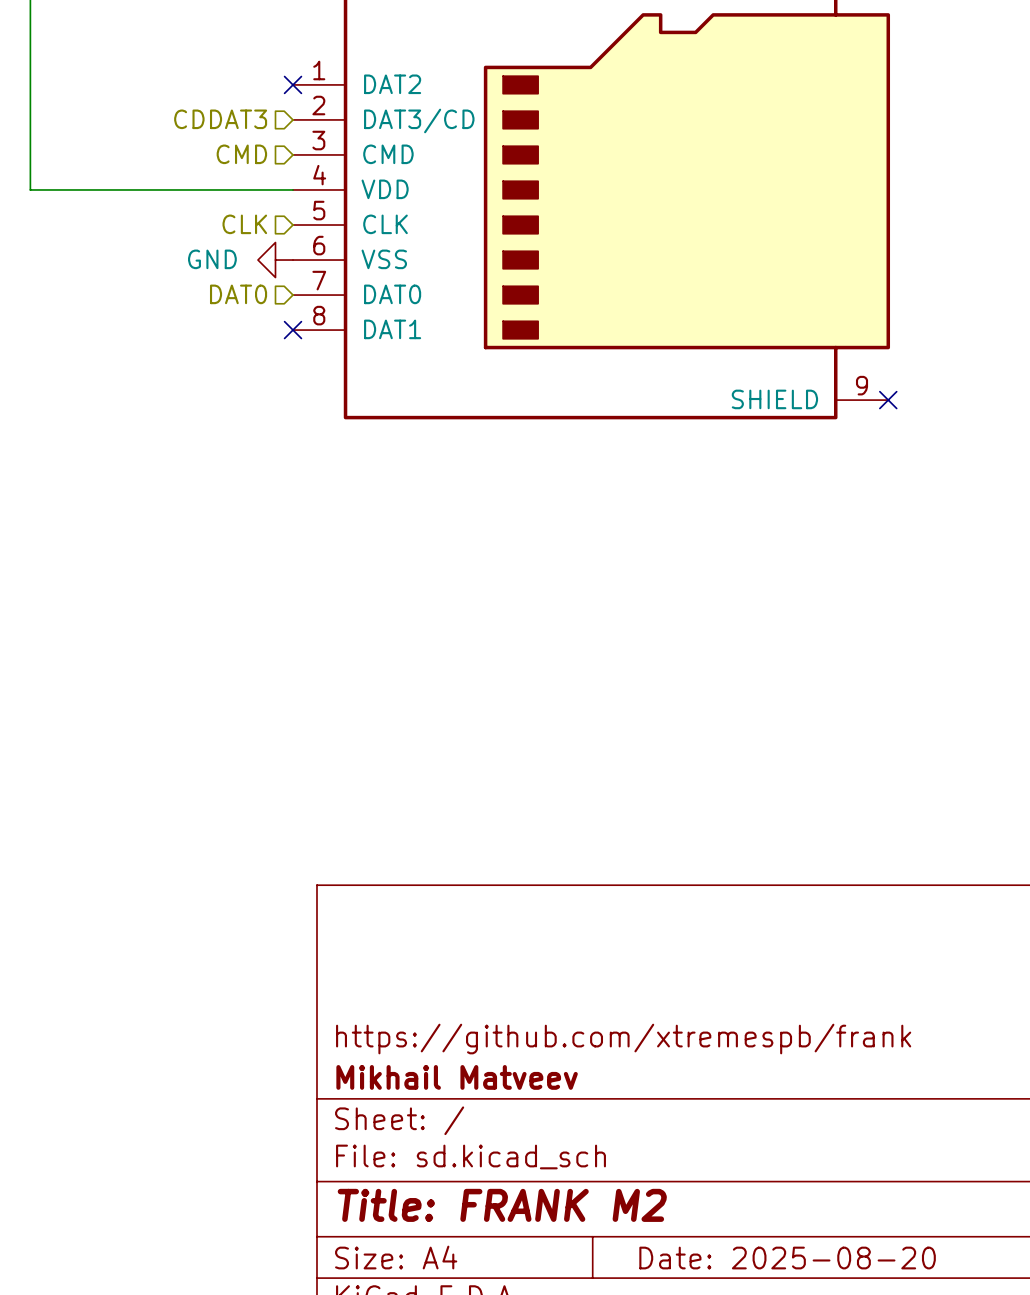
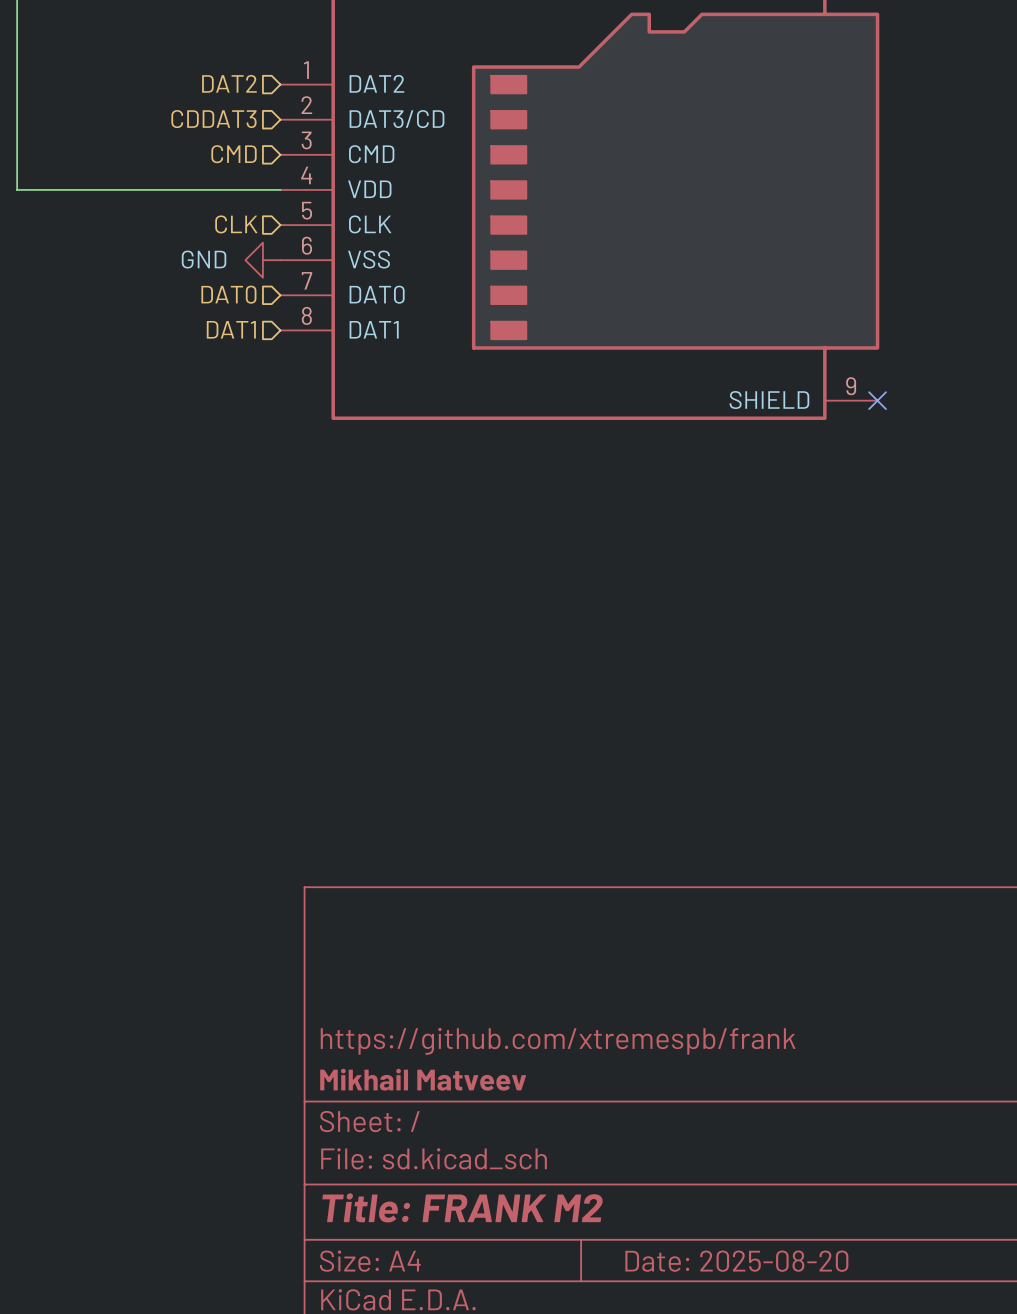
hierarchical label: none -> DAT2 (229, 83)
no-connect mark: (293, 84) -> none
hierarchical label: none -> DAT1 (231, 329)
no-connect mark: (293, 330) -> none

